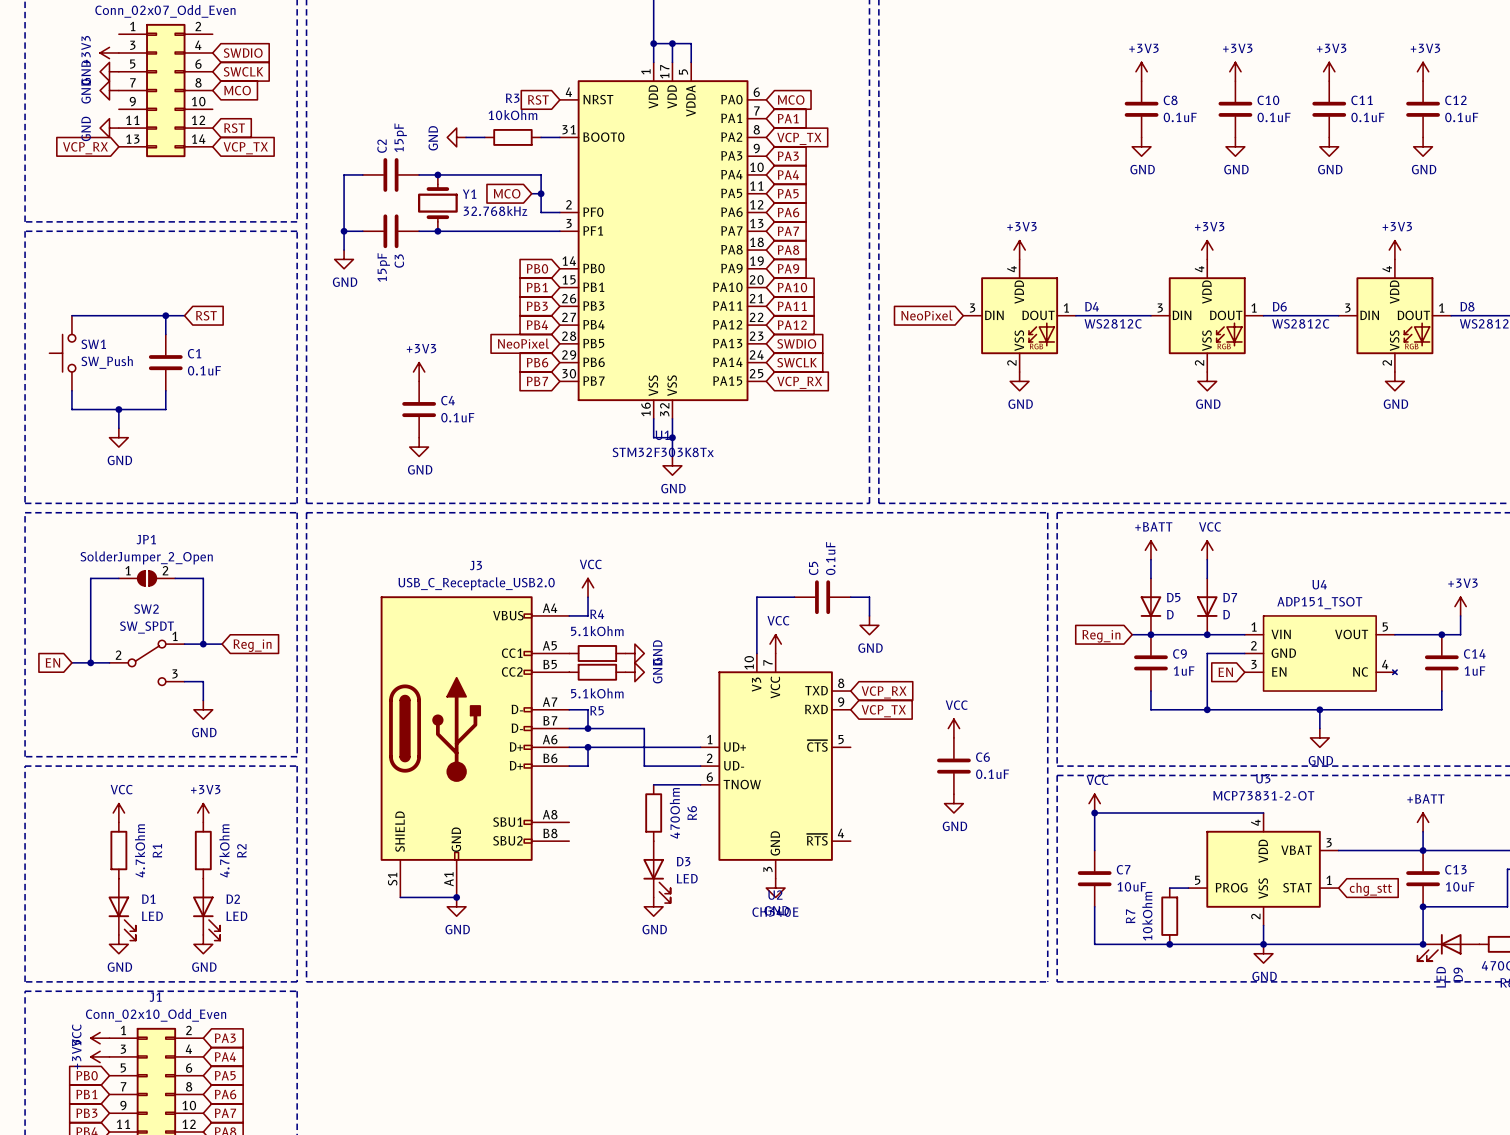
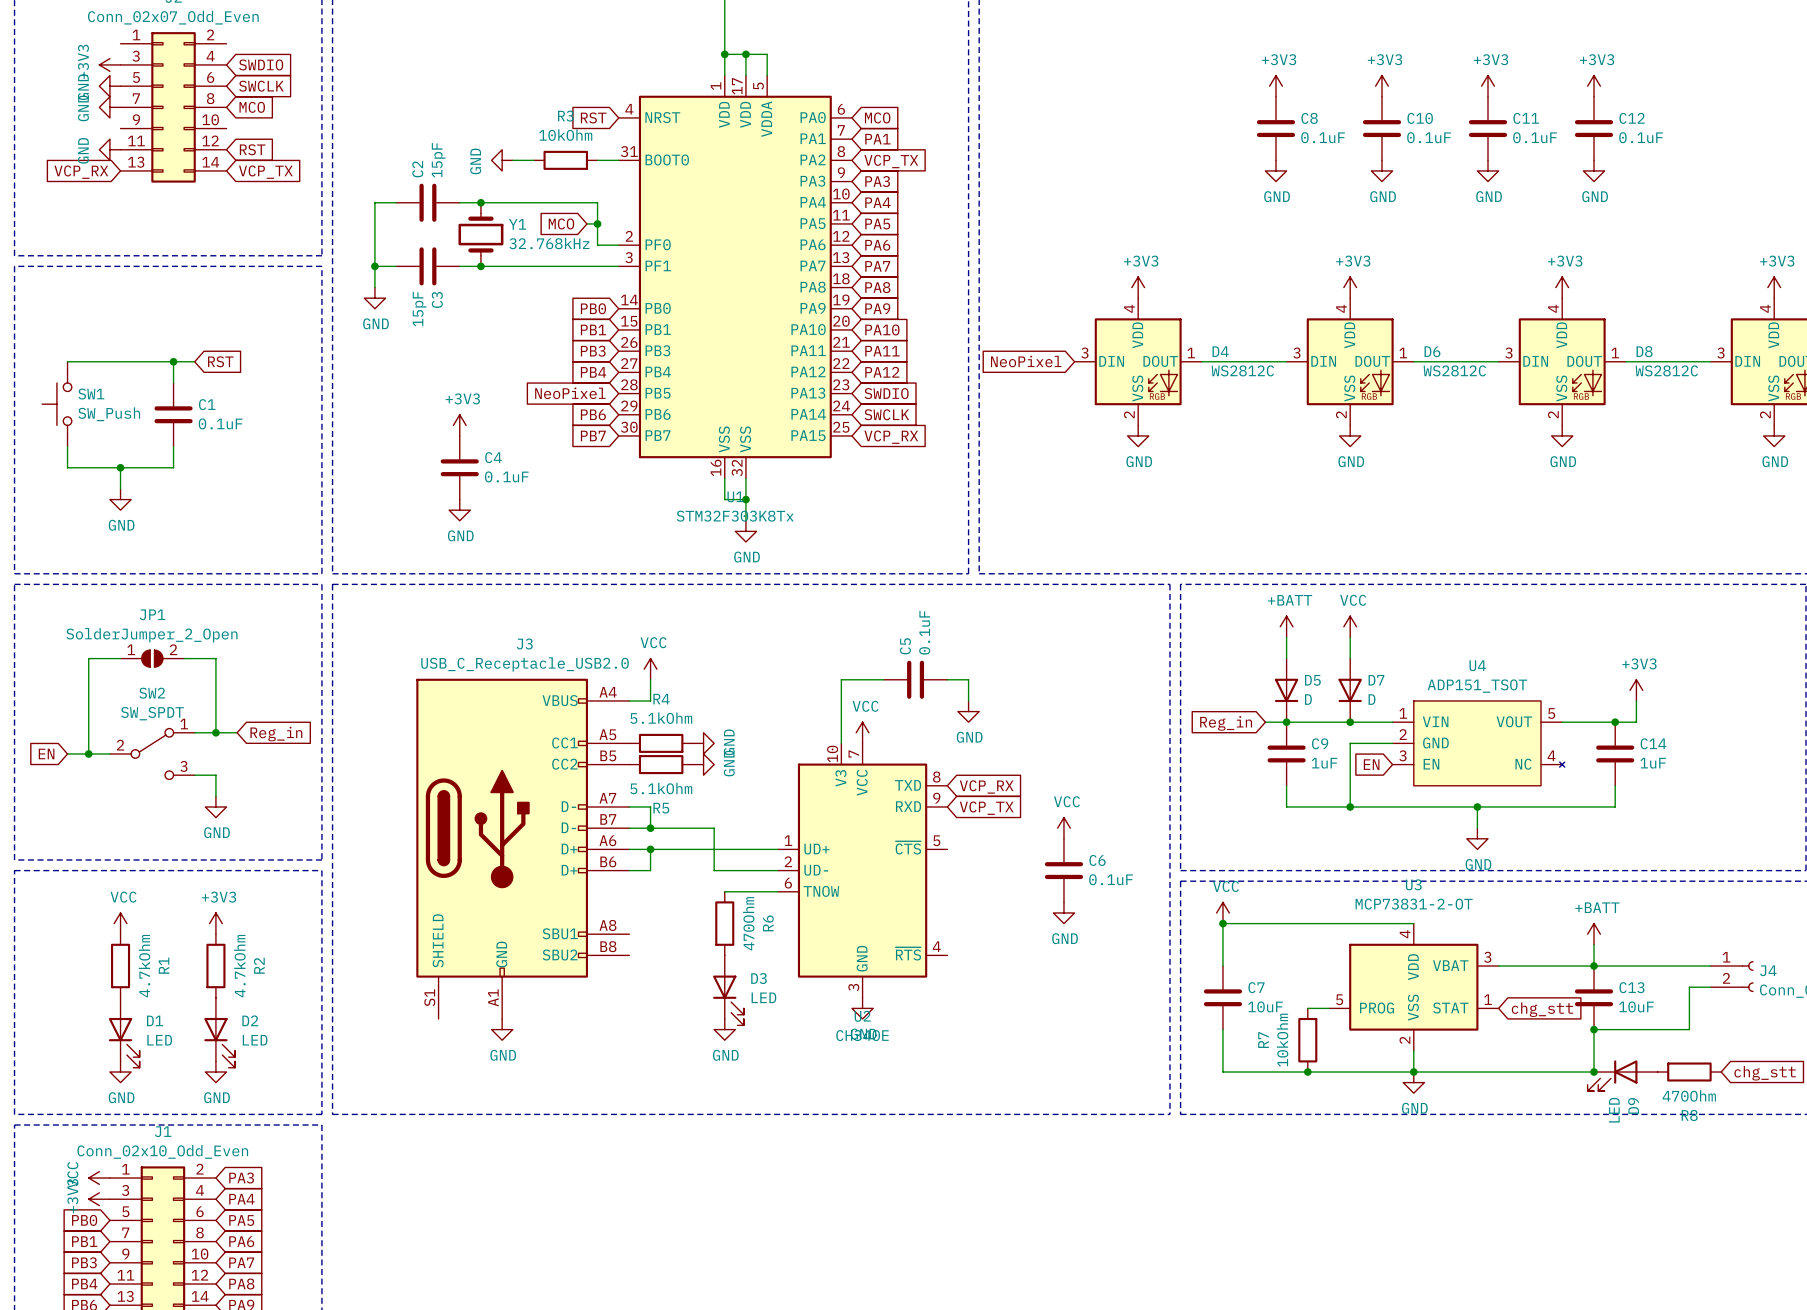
wire: (400, 897) (456, 897) -> none
junction: (456, 897) -> none

